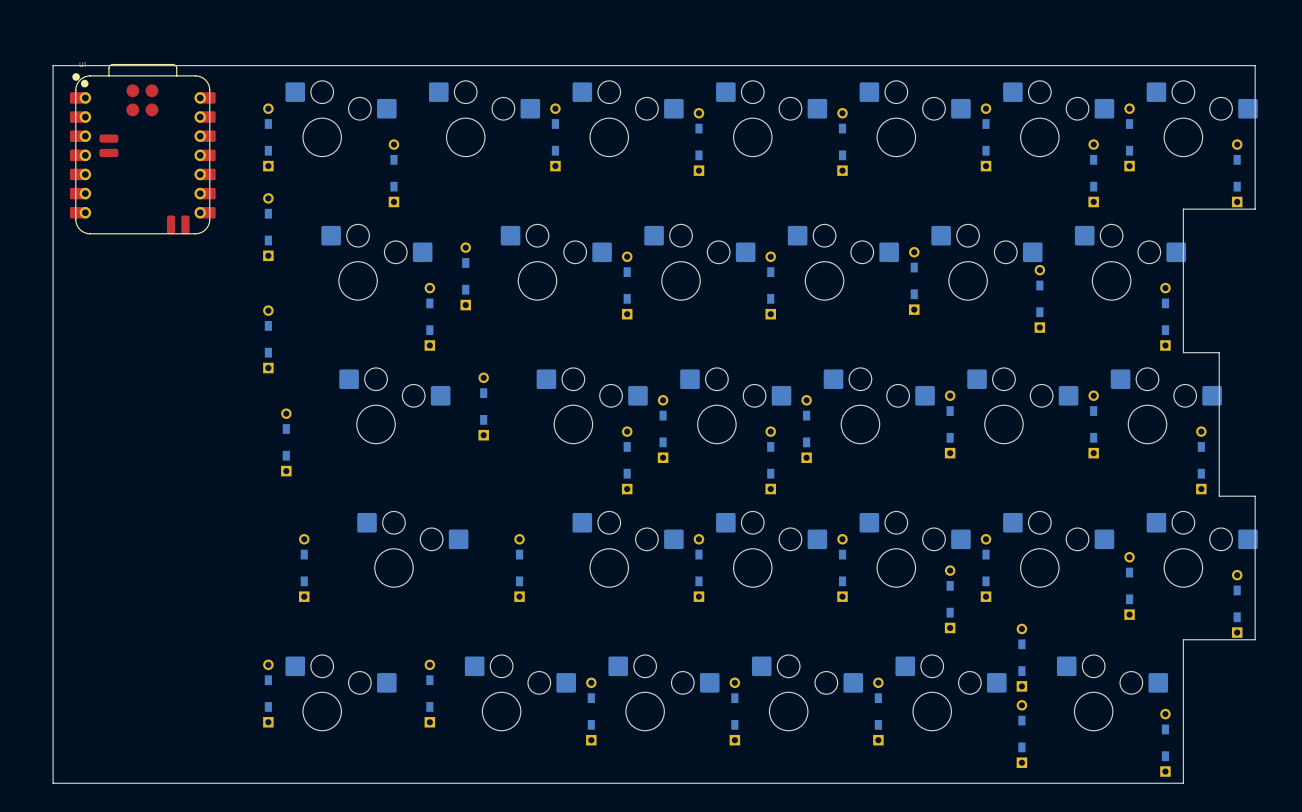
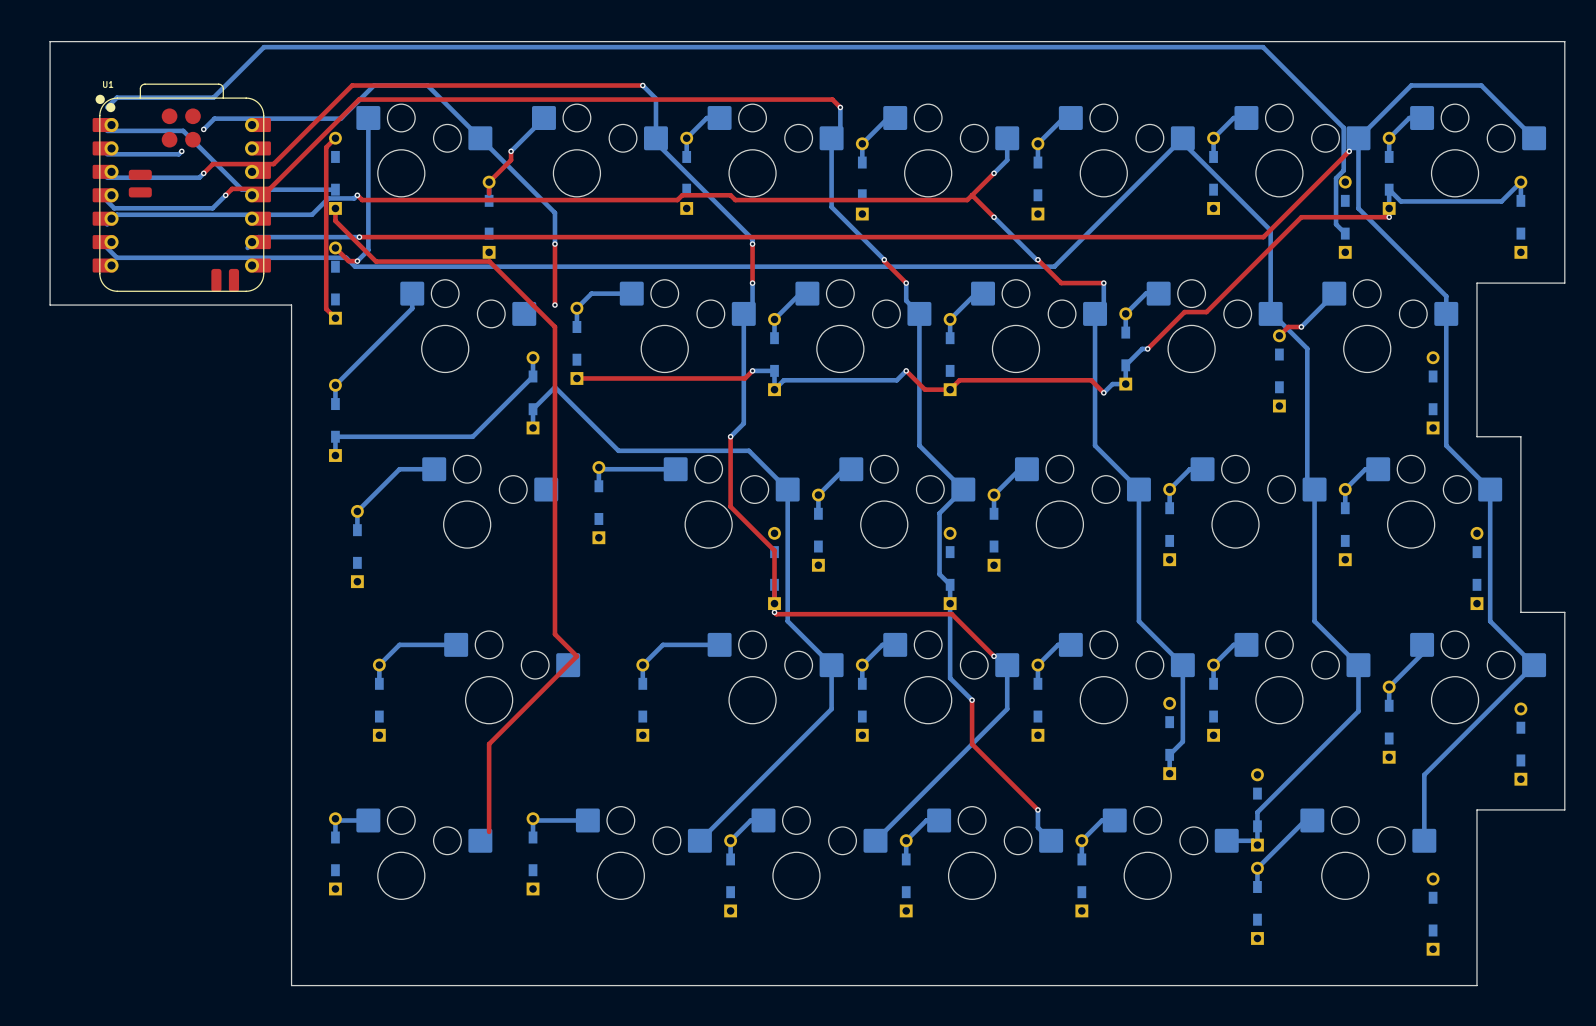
bottom track: none -> (642, 85) (655, 98) (655, 142) (752, 239) (752, 244)
top track: none -> (642, 85) (352, 85) (273, 164) (212, 164) (203, 173)
via: none -> (642, 85)
bottom track: none -> (107, 107) (116, 97) (213, 97) (264, 47) (1263, 47) (1343, 127) (1343, 170) (1336, 178) (1336, 224) (1345, 233)
bottom track: none -> (840, 107) (840, 129) (831, 138) (831, 207) (884, 259)
top track: none -> (840, 107) (832, 99) (359, 99) (269, 188) (232, 188) (225, 195)
via: none -> (840, 107)
bottom track: none -> (368, 118) (368, 250) (357, 261)
bottom track: none -> (543, 118) (511, 151)
bottom track: none -> (719, 118) (706, 118) (686, 138) (686, 156)
bottom track: none -> (895, 118) (888, 118) (862, 143) (862, 162)
bottom track: none -> (1070, 118) (1063, 118) (1037, 143) (1037, 162)
bottom track: none -> (1246, 118) (1233, 118) (1213, 138) (1213, 156)
bottom track: none -> (1422, 118) (1409, 118) (1389, 138) (1389, 156)
bottom track: none -> (203, 129) (214, 118) (340, 118) (373, 85) (427, 85) (554, 212) (554, 244)
via: none -> (203, 129)
bottom track: none -> (107, 130) (183, 130) (242, 189) (335, 189)
top track: none -> (335, 138) (326, 147) (326, 309) (335, 318)
bottom track: none -> (1007, 138) (1007, 160) (994, 173)
bottom track: none -> (1358, 138) (1358, 208) (1446, 296) (1446, 445) (1490, 489) (1490, 621) (1534, 665) (1424, 774) (1424, 840)
bottom track: none -> (1534, 138) (1481, 85) (1411, 85) (1349, 147) (1349, 151)
bottom track: none -> (181, 151) (178, 154) (107, 154)
via: none -> (181, 151)
top track: none -> (511, 151) (511, 160) (489, 182) (489, 193)
via: none -> (511, 151)
top track: none -> (1349, 151) (1263, 237) (359, 237)
via: none -> (1349, 151)
bottom track: none -> (203, 173) (199, 177) (107, 177)
via: none -> (203, 173)
top track: none -> (994, 173) (967, 200) (735, 200) (730, 195) (682, 195) (677, 200) (362, 200) (357, 195)
via: none -> (994, 173)
bottom track: none -> (225, 195) (212, 208) (114, 208) (107, 201)
via: none -> (225, 195)
bottom track: none -> (357, 195) (354, 198) (328, 198) (312, 214) (116, 214) (107, 224)
via: none -> (357, 195)
top track: none -> (972, 195) (994, 217)
bottom track: none -> (1520, 200) (1520, 182) (1501, 201) (1400, 201) (1389, 189) (1389, 217)
top track: none -> (335, 208) (335, 220) (376, 261) (489, 261) (554, 326) (554, 634) (576, 656) (489, 744) (489, 831)
bottom track: none -> (994, 217) (1037, 259)
via: none -> (994, 217)
top track: none -> (1389, 217) (1301, 217) (1206, 312) (1184, 312) (1147, 348)
via: none -> (1389, 217)
bottom track: none -> (359, 237) (258, 237) (247, 247)
via: none -> (359, 237)
top track: none -> (554, 244) (554, 305)
via: none -> (554, 244)
top track: none -> (752, 244) (752, 283)
via: none -> (752, 244)
bottom track: none -> (107, 247) (116, 257) (346, 257) (355, 266) (1054, 266) (1182, 138) (1182, 142) (1270, 230) (1270, 313) (1307, 348) (1307, 482) (1314, 489) (1314, 621) (1358, 665) (1358, 711) (1257, 812) (1257, 845) (1253, 840) (1226, 840)
top track: none -> (335, 247) (348, 261) (357, 261)
top track: none -> (884, 259) (906, 283)
via: none -> (884, 259)
top track: none -> (1037, 259) (1061, 283) (1103, 283)
via: none -> (1037, 259)
via: none -> (357, 261)
bottom track: none -> (752, 283) (752, 305) (743, 313) (743, 423) (730, 436)
via: none -> (752, 283)
bottom track: none -> (906, 283) (906, 300) (919, 313) (919, 445) (963, 489) (939, 513) (939, 574) (950, 584) (950, 678) (972, 700)
via: none -> (906, 283)
bottom track: none -> (1103, 283) (1103, 305) (1095, 313) (1095, 445) (1138, 489) (1138, 621) (1182, 665) (1182, 741) (1169, 754) (1169, 773)
via: none -> (1103, 283)
bottom track: none -> (412, 293) (412, 308) (335, 385) (335, 404)
bottom track: none -> (631, 293) (591, 293) (576, 308) (576, 326)
bottom track: none -> (807, 293) (800, 293) (774, 319) (774, 338)
bottom track: none -> (983, 293) (975, 293) (950, 319) (950, 338)
bottom track: none -> (1158, 293) (1145, 293) (1125, 313) (1125, 332)
bottom track: none -> (1334, 293) (1301, 326)
via: none -> (554, 305)
top track: none -> (1301, 326) (1288, 326) (1279, 335)
via: none -> (1301, 326)
bottom track: none -> (1147, 348) (1142, 348) (1125, 365) (1125, 384) (1112, 384) (1103, 392)
via: none -> (1147, 348)
bottom track: none -> (533, 357) (533, 376) (472, 436) (335, 436) (335, 455)
bottom track: none -> (752, 370) (774, 370) (774, 389) (783, 380) (896, 380) (906, 370)
top track: none -> (752, 370) (744, 378) (576, 378)
via: none -> (752, 370)
top track: none -> (906, 370) (924, 389) (950, 389) (959, 380) (1091, 380) (1103, 392)
via: none -> (906, 370)
via: none -> (1103, 392)
bottom track: none -> (533, 427) (533, 409) (554, 387) (618, 450) (748, 450) (787, 489) (787, 621) (831, 665) (831, 709) (699, 840)
top track: none -> (730, 436) (730, 506) (774, 550) (774, 603)
via: none -> (730, 436)
board edge: (1201, 352) (1183, 352) (1183, 209) (1255, 209) (1255, 65) (53, 65) (53, 783) (1183, 783) (1183, 639) (1255, 639) (1255, 496) -> (1476, 436) (1476, 283) (1564, 283) (1564, 41) (50, 41) (50, 305) (291, 305) (291, 985) (1476, 985) (1476, 809) (1564, 809) (1564, 612) (1542, 612)
board edge: (1219, 352) (1219, 496) (1237, 496) -> (1498, 436) (1520, 436) (1520, 612)
bottom track: none -> (434, 469) (399, 469) (357, 511) (357, 530)
bottom track: none -> (675, 469) (600, 469) (598, 467) (598, 486)
bottom track: none -> (851, 469) (844, 469) (818, 495) (818, 513)
bottom track: none -> (1026, 469) (1019, 469) (994, 495) (994, 513)
bottom track: none -> (1202, 469) (1189, 469) (1169, 489) (1169, 508)
bottom track: none -> (1378, 469) (1365, 469) (1345, 489) (1345, 508)
top track: none -> (774, 612) (776, 614) (951, 614) (994, 656)
via: none -> (774, 612)
bottom track: none -> (456, 644) (399, 644) (379, 665) (379, 683)
bottom track: none -> (719, 644) (662, 644) (642, 665) (642, 683)
bottom track: none -> (895, 644) (882, 644) (862, 665) (862, 683)
bottom track: none -> (1070, 644) (1058, 644) (1037, 665) (1037, 683)
bottom track: none -> (1246, 644) (1233, 644) (1213, 665) (1213, 683)
bottom track: none -> (1422, 644) (1422, 654) (1389, 687) (1389, 705)
via: none -> (994, 656)
bottom track: none -> (1007, 665) (1007, 709) (875, 840)
top track: none -> (972, 700) (972, 744) (1037, 809)
via: none -> (972, 700)
bottom track: none -> (1037, 809) (1037, 827) (1051, 840)
via: none -> (1037, 809)
bottom track: none -> (368, 820) (337, 820) (335, 818) (335, 837)
bottom track: none -> (587, 820) (534, 820) (533, 818) (533, 837)
bottom track: none -> (763, 820) (750, 820) (730, 840) (730, 859)
bottom track: none -> (939, 820) (926, 820) (906, 840) (906, 859)
bottom track: none -> (1114, 820) (1102, 820) (1081, 840) (1081, 859)
bottom track: none -> (1312, 820) (1305, 820) (1257, 868) (1257, 886)

